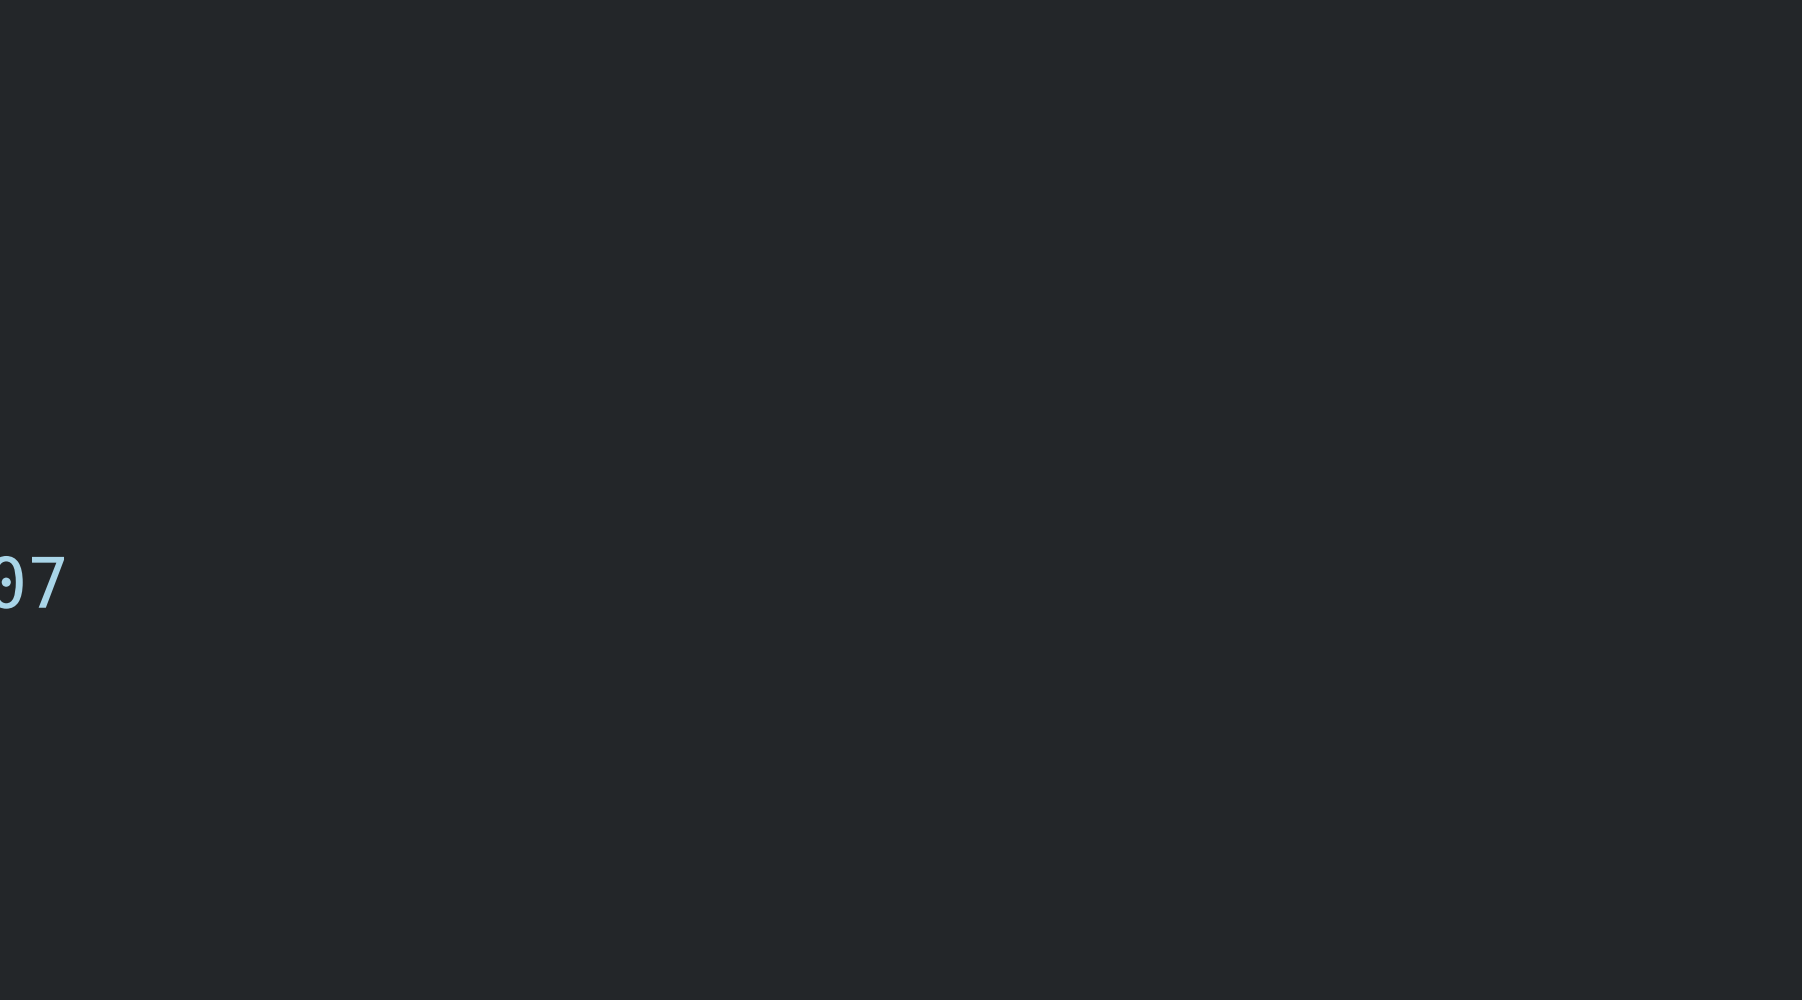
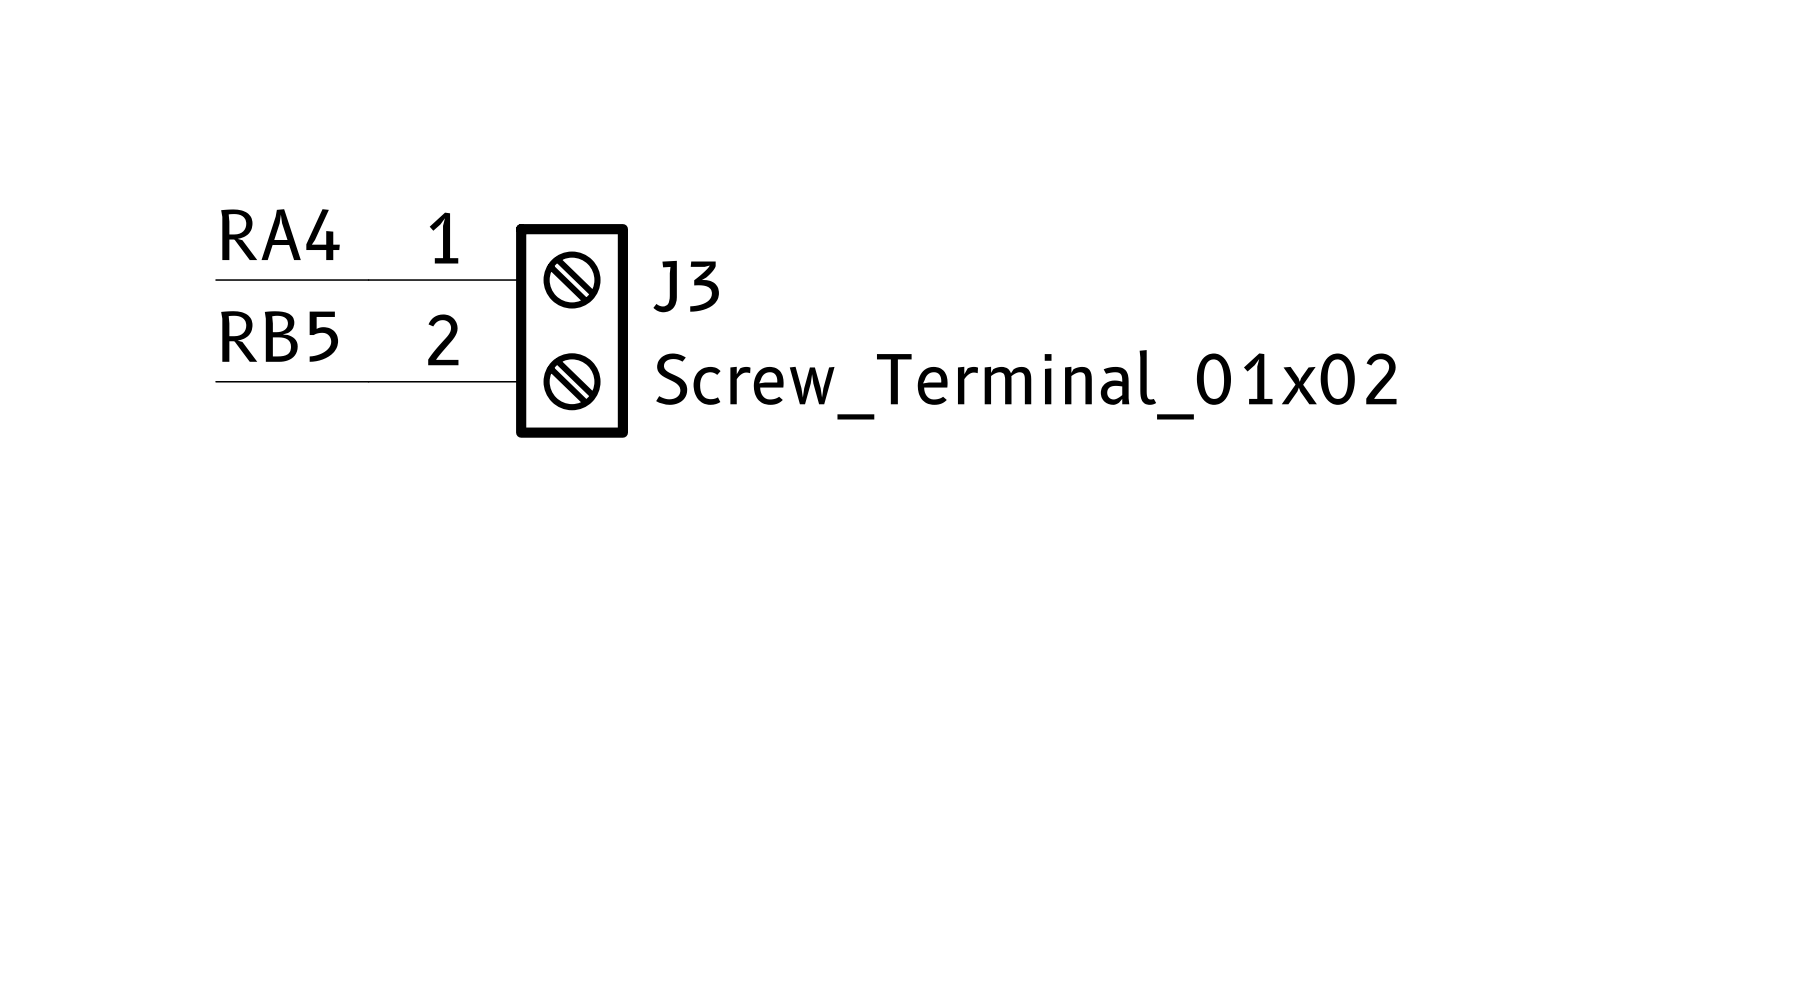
label: none -> RA4 (280, 234)
wire: none -> (215, 280) (368, 280)
J3: none -> Screw_Terminal_01x02 (498, 330)
label: none -> RB5 (279, 336)
wire: none -> (215, 381) (368, 381)

